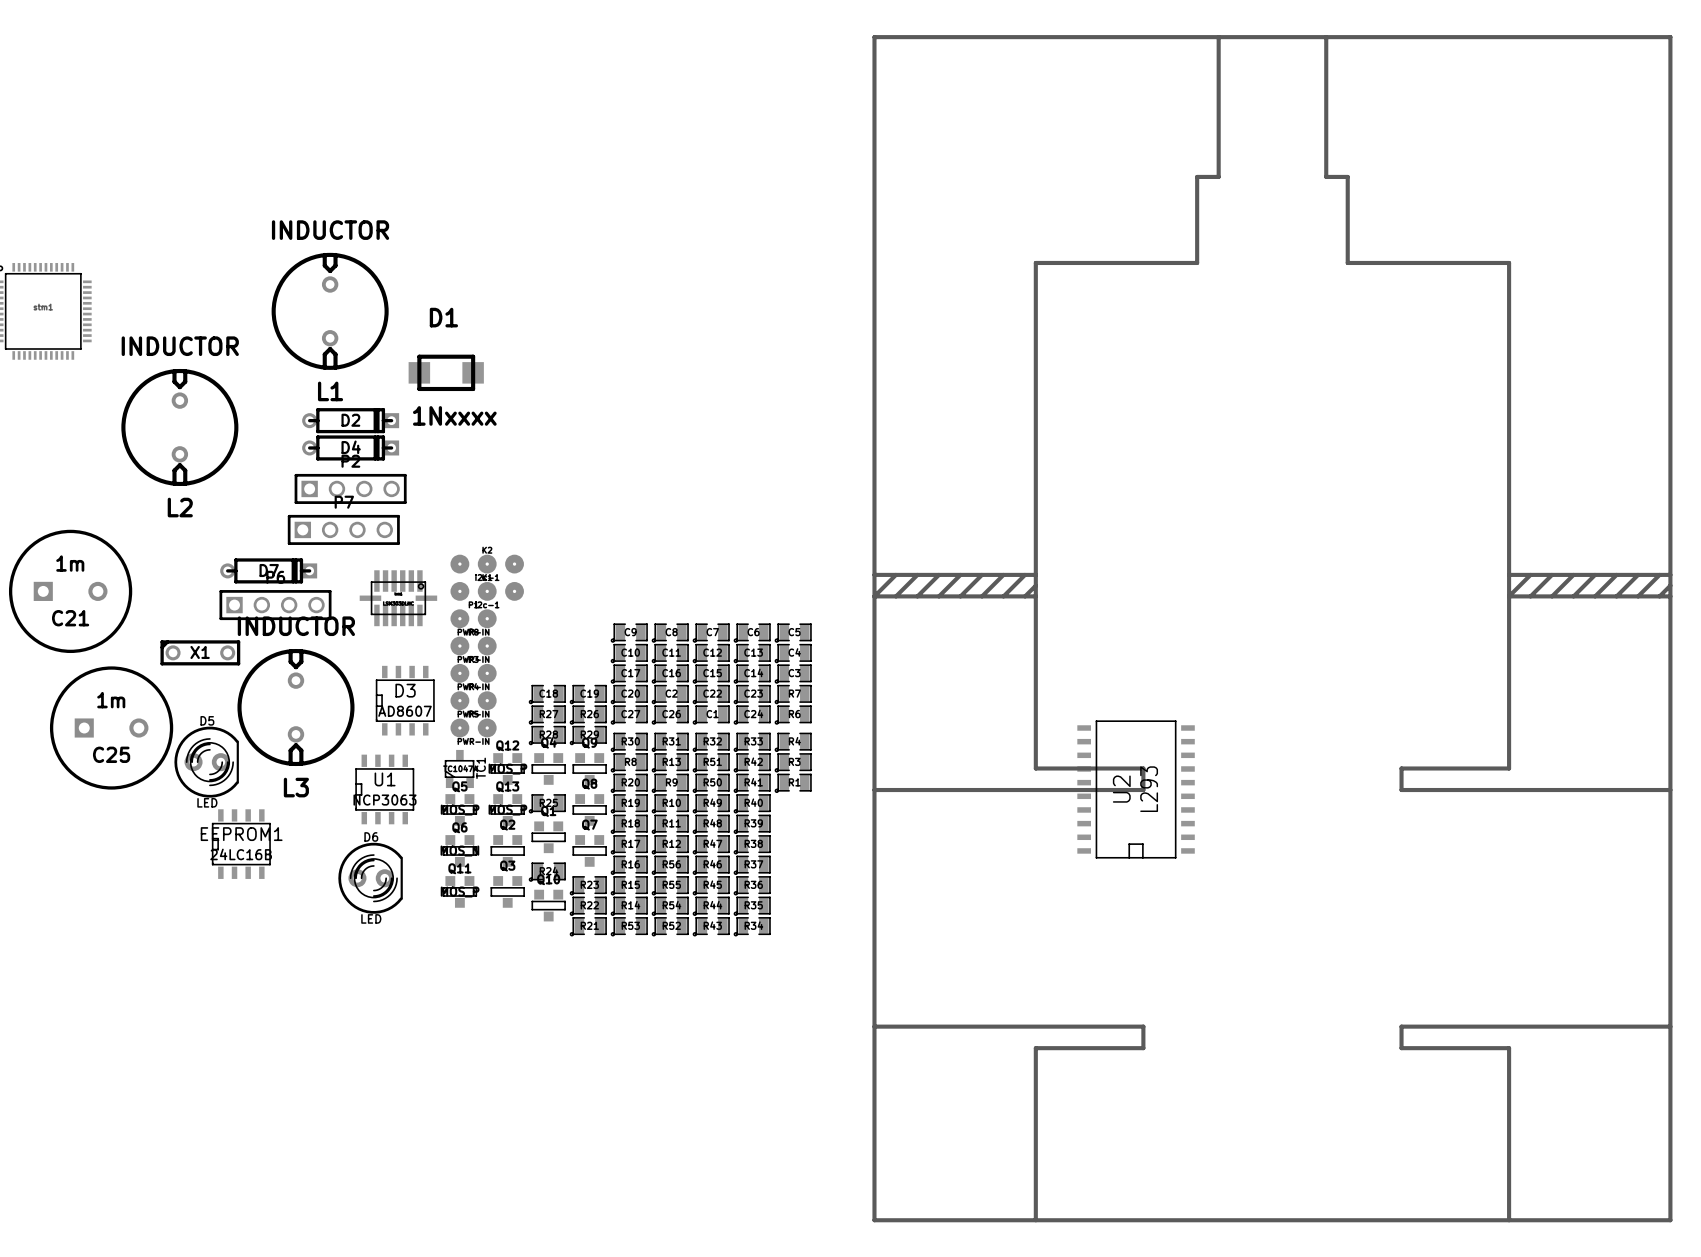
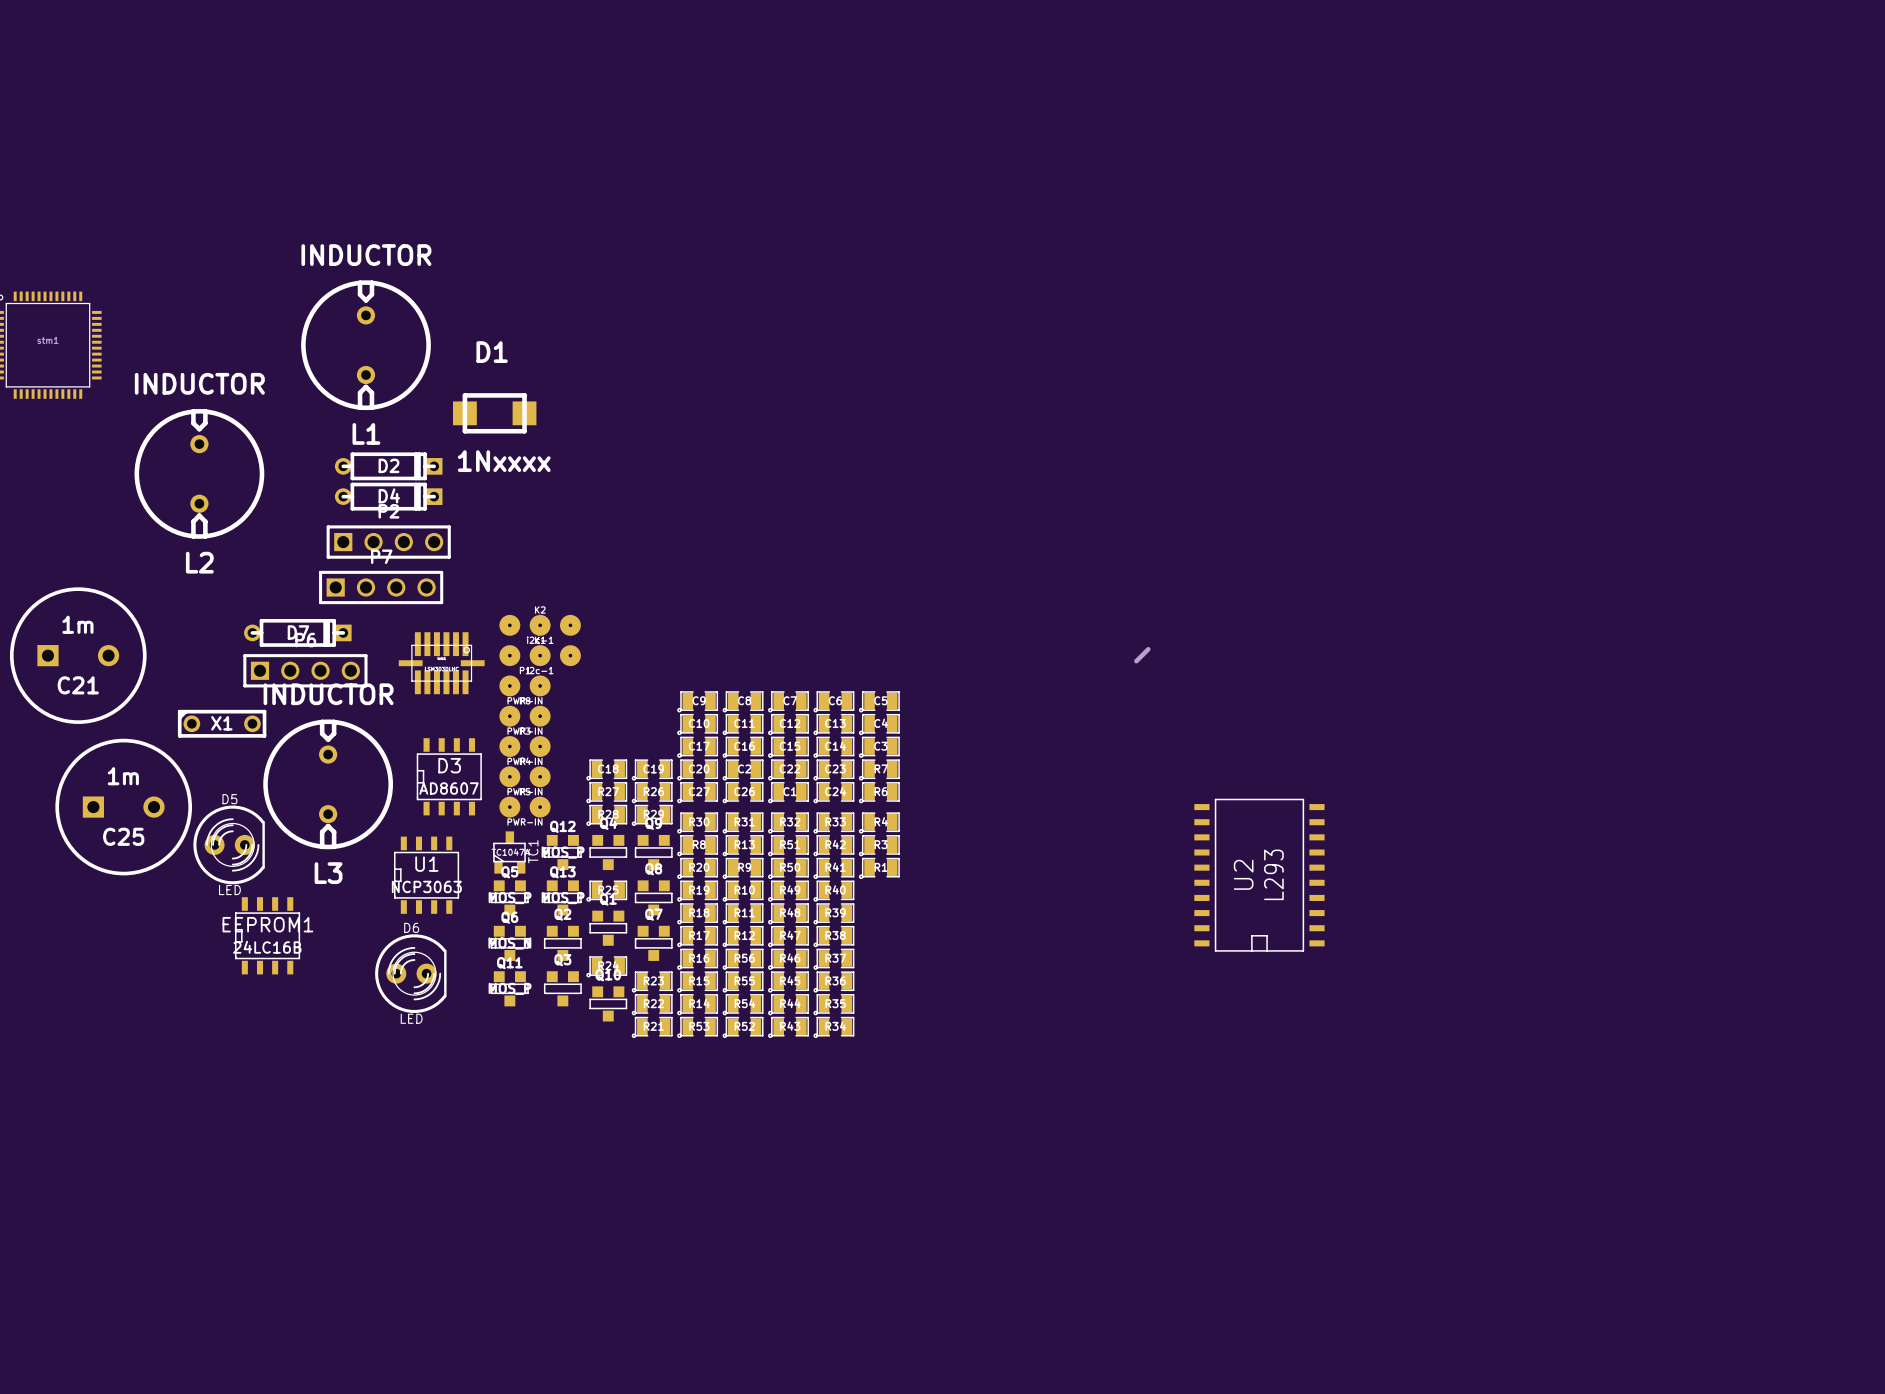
line: (874, 37) (874, 1220) (1670, 1220) (1670, 37) (874, 37) -> none
line: (1218, 37) (1218, 176) (1197, 176) (1197, 262) (1035, 262) (1035, 768) (1143, 768) (1143, 790) (874, 790) -> none
line: (1326, 37) (1326, 176) (1347, 176) (1347, 262) (1509, 262) (1509, 768) (1401, 768) (1401, 790) (1670, 790) -> none
line: (874, 574) (1035, 574) -> none
line: (895, 574) (874, 596) (1035, 596) -> none
line: (917, 574) (896, 596) -> none
line: (939, 574) (917, 596) -> none
line: (960, 574) (939, 596) -> none
line: (982, 574) (960, 596) -> none
line: (1003, 574) (982, 596) -> none
line: (1025, 574) (1003, 596) -> none
line: (1509, 574) (1670, 574) -> none
line: (1530, 574) (1509, 596) (1670, 596) -> none
line: (1552, 574) (1530, 596) -> none
line: (1573, 574) (1552, 596) -> none
line: (1595, 574) (1573, 596) -> none
line: (1616, 574) (1595, 596) -> none
line: (1638, 574) (1616, 596) -> none
line: (1659, 574) (1638, 596) -> none
line: (1670, 585) (1659, 596) -> none
line: (874, 1026) (1143, 1026) (1143, 1048) (1035, 1048) (1035, 1220) -> none
line: (1670, 1026) (1401, 1026) (1401, 1048) (1509, 1048) (1509, 1220) -> none

